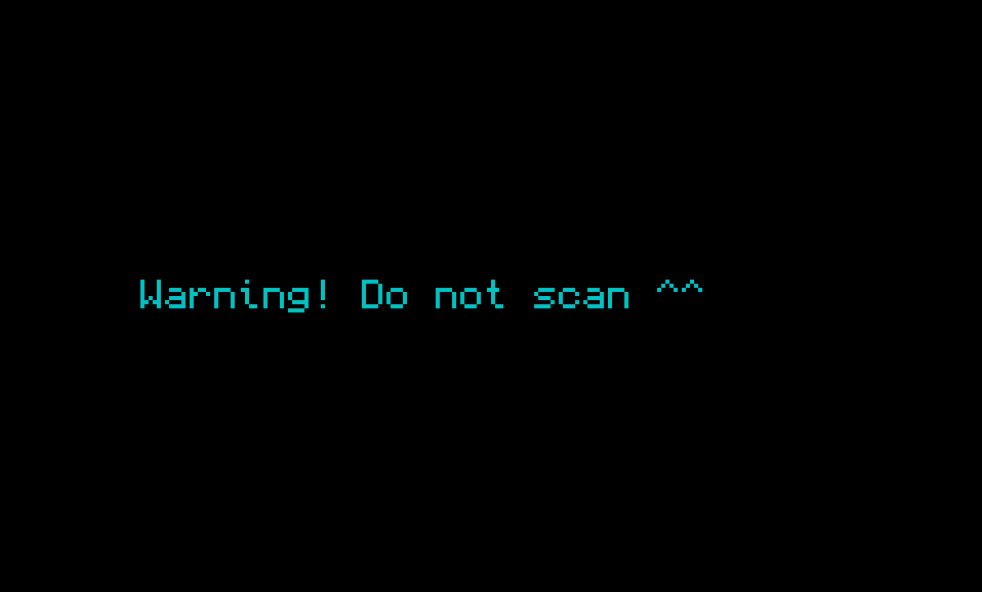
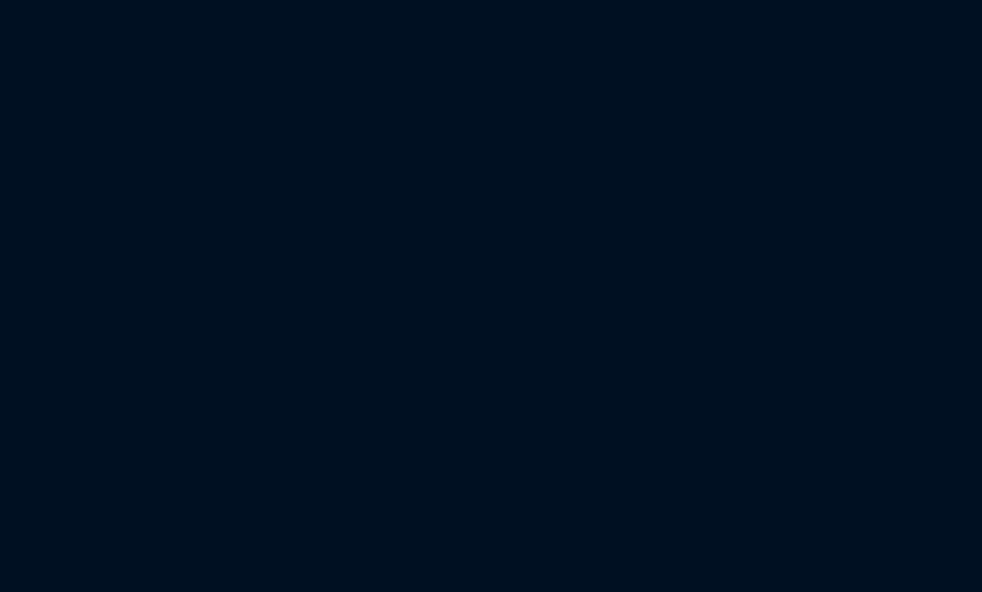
drawing: [140, 279, 703, 313] -> none

